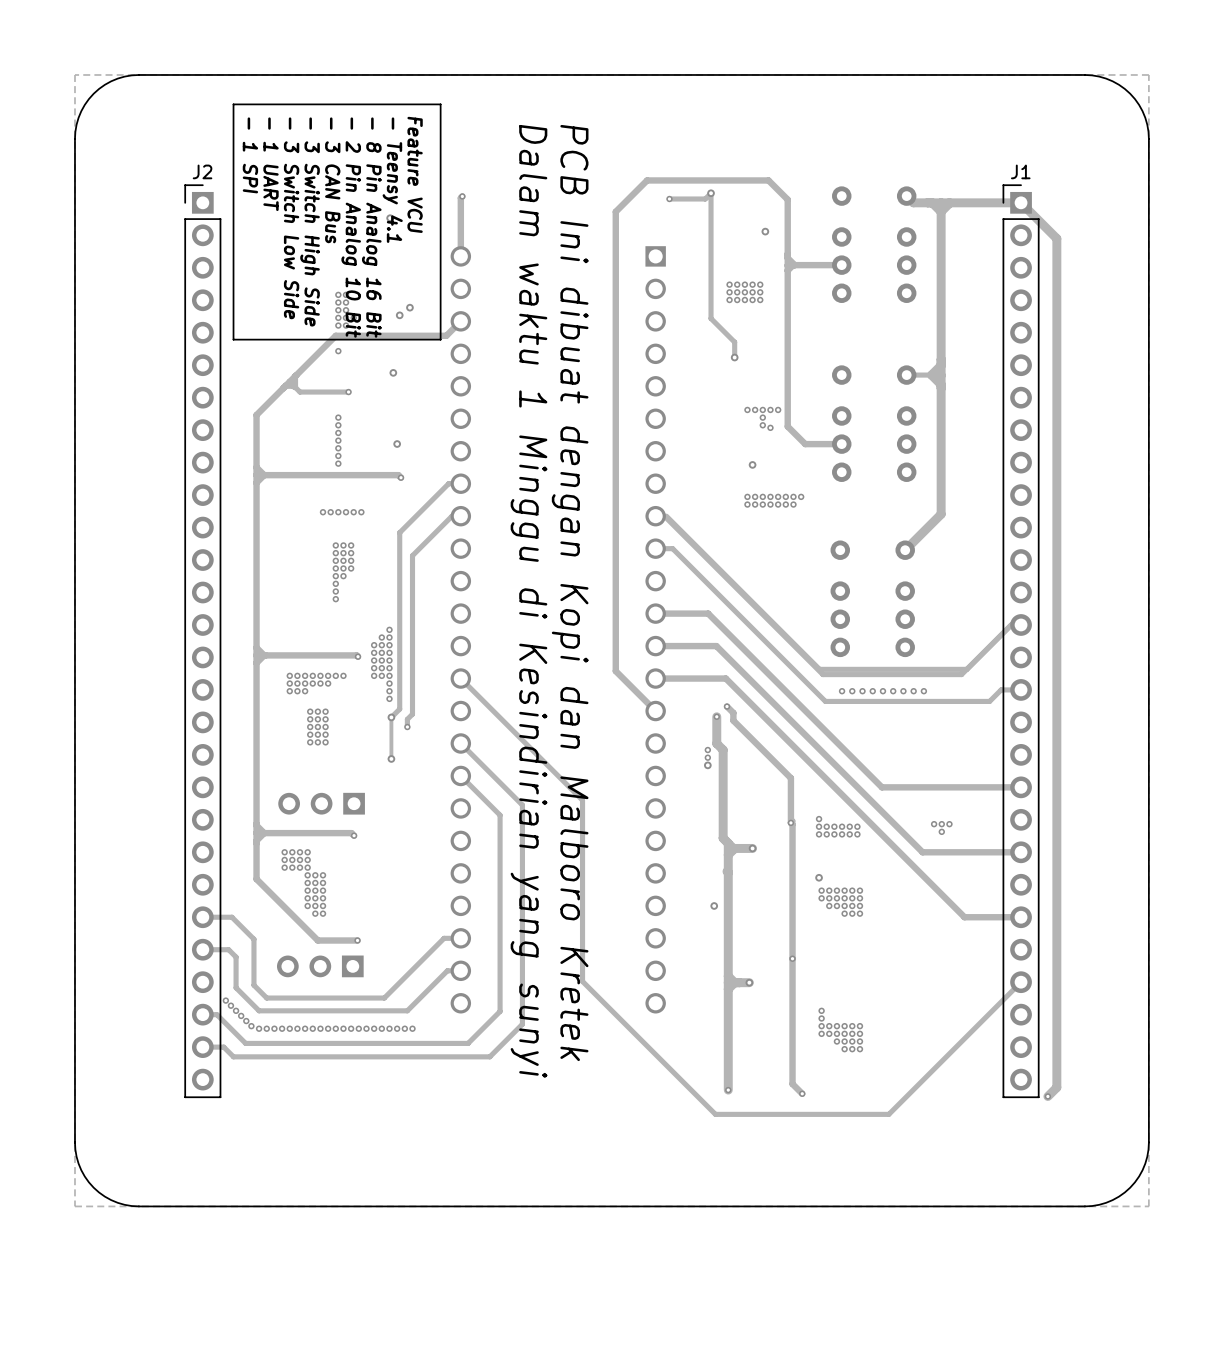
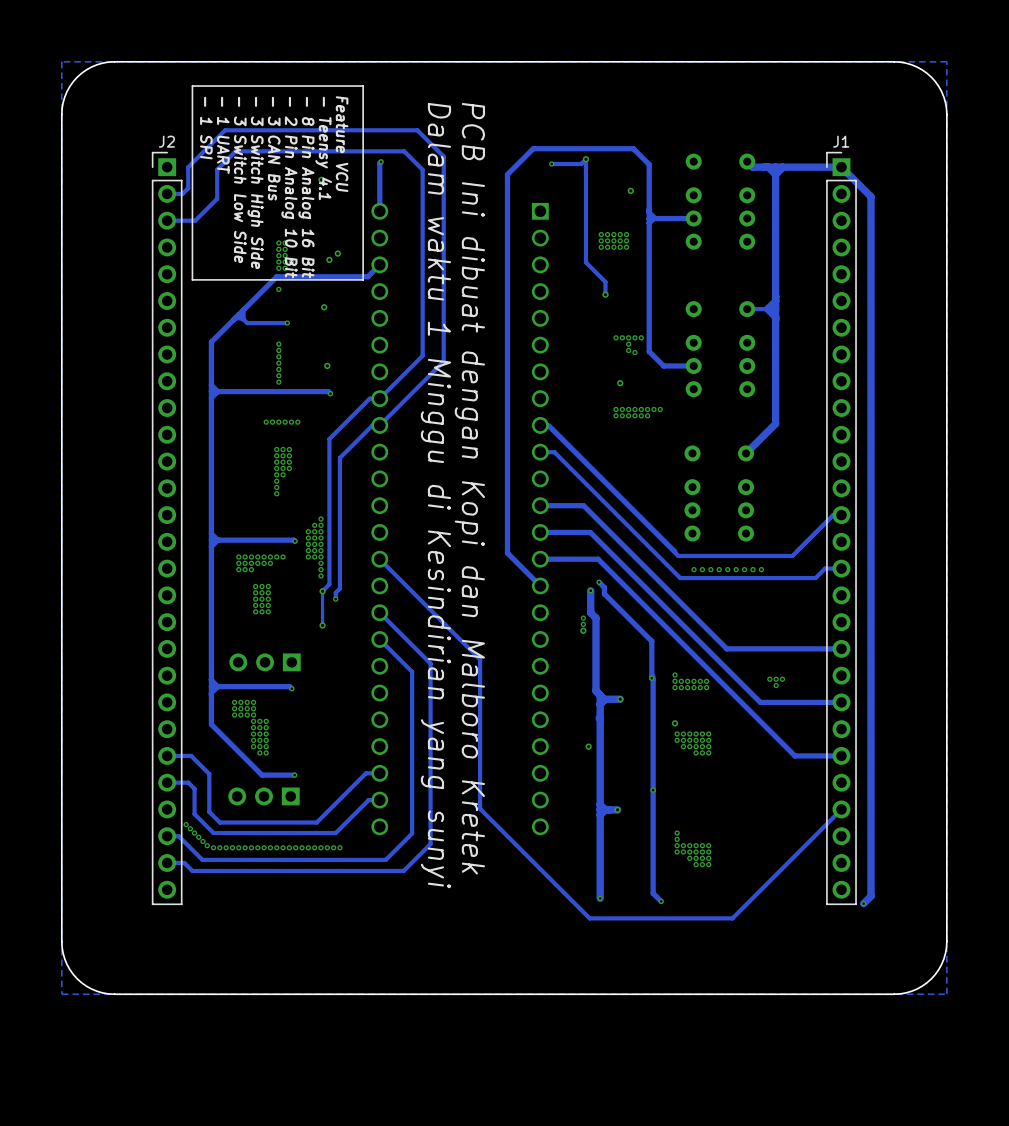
track: none -> (167, 193) (182, 193) (188, 188) (188, 167) (225, 130) (417, 130) (443, 156) (443, 361) (379, 425)
track: none -> (167, 220) (195, 220) (217, 198) (217, 169) (235, 151) (404, 151) (422, 169) (422, 355) (379, 398)
via: (793, 504) -> none
track: (966, 669) (819, 669) -> none

